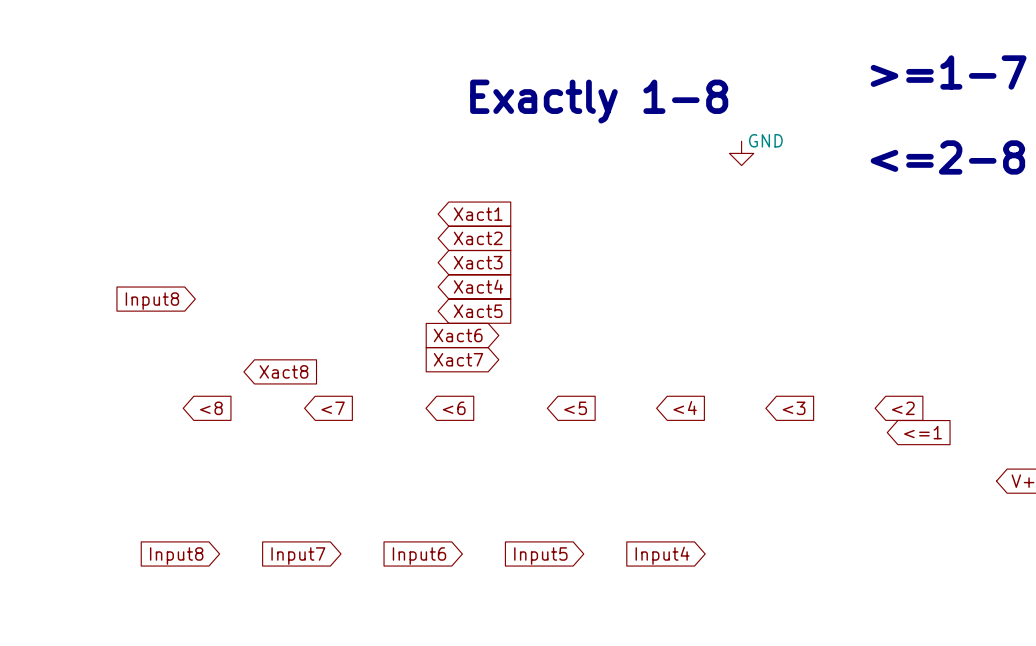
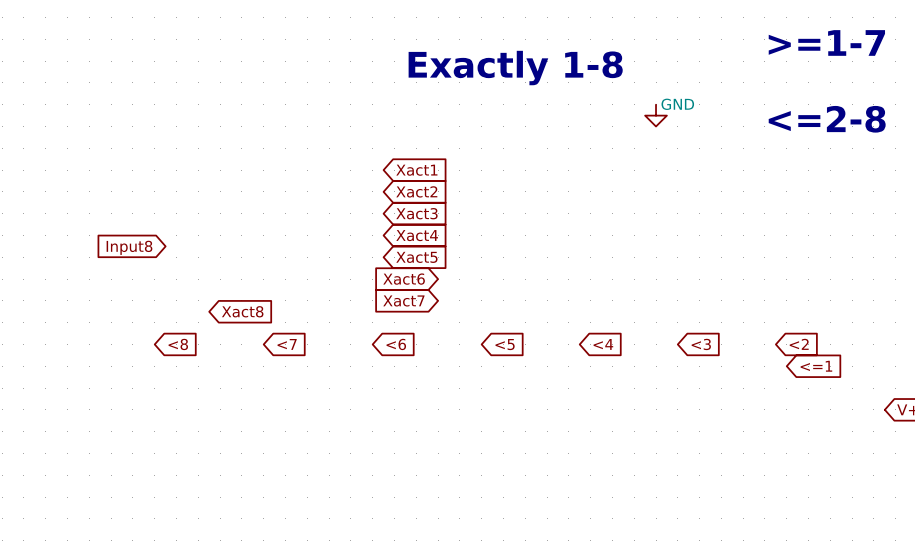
global label: Input4 (662, 555) -> none
global label: Input8 (176, 556) -> none
global label: Input7 (298, 556) -> none
global label: Input6 (419, 556) -> none
global label: Input5 (540, 556) -> none

